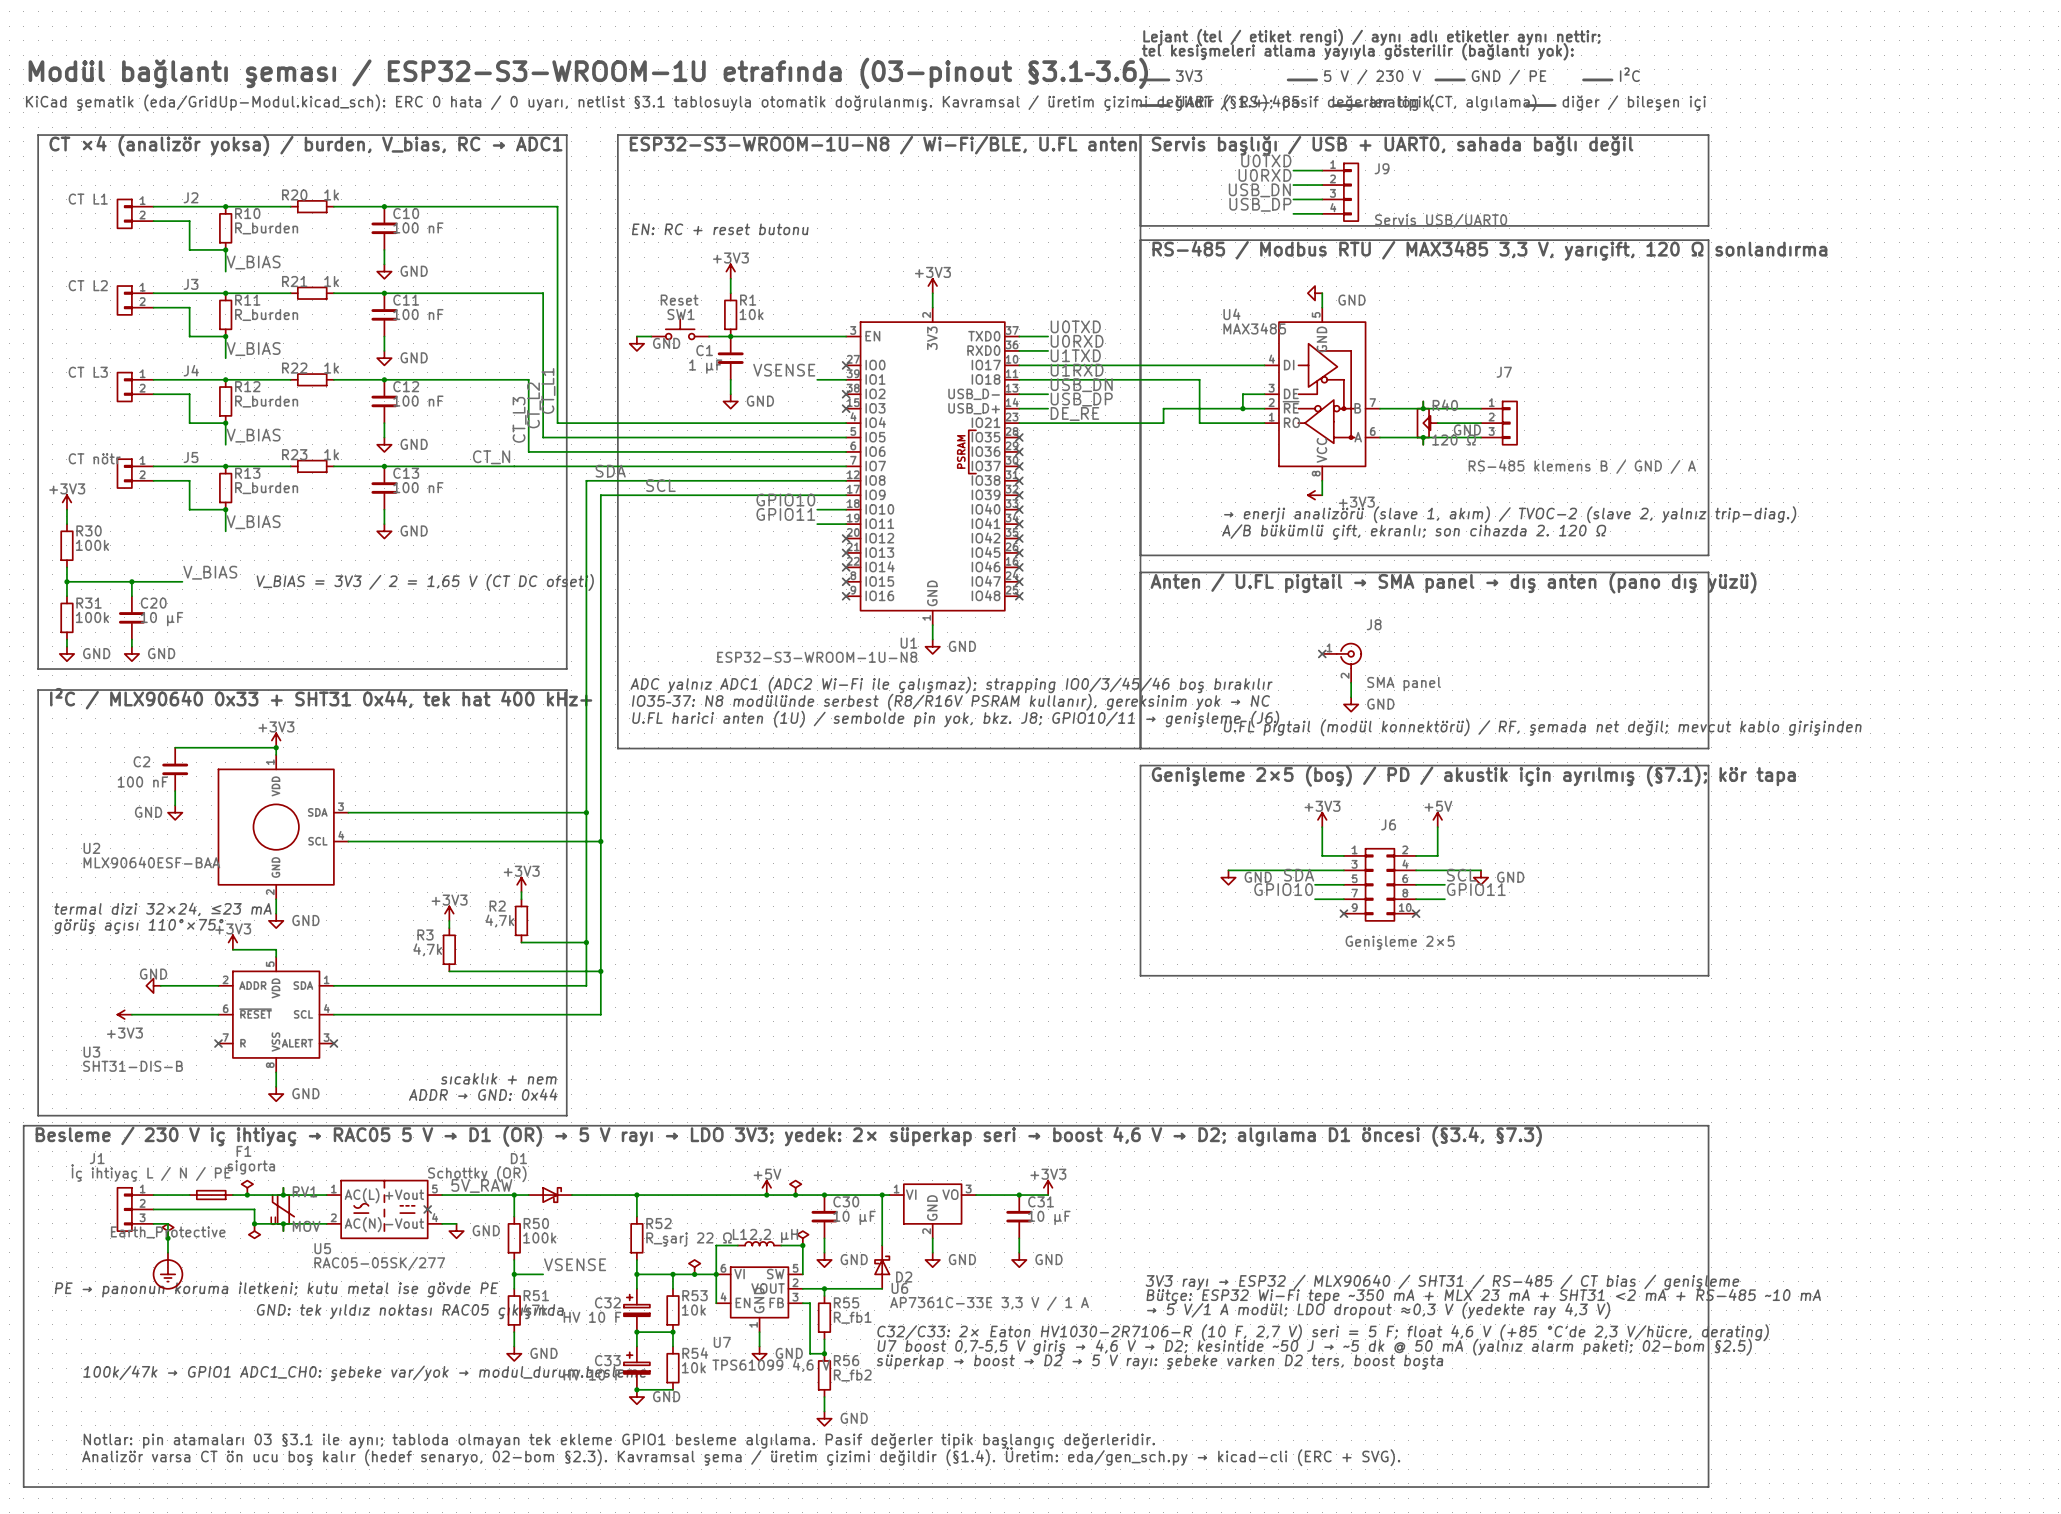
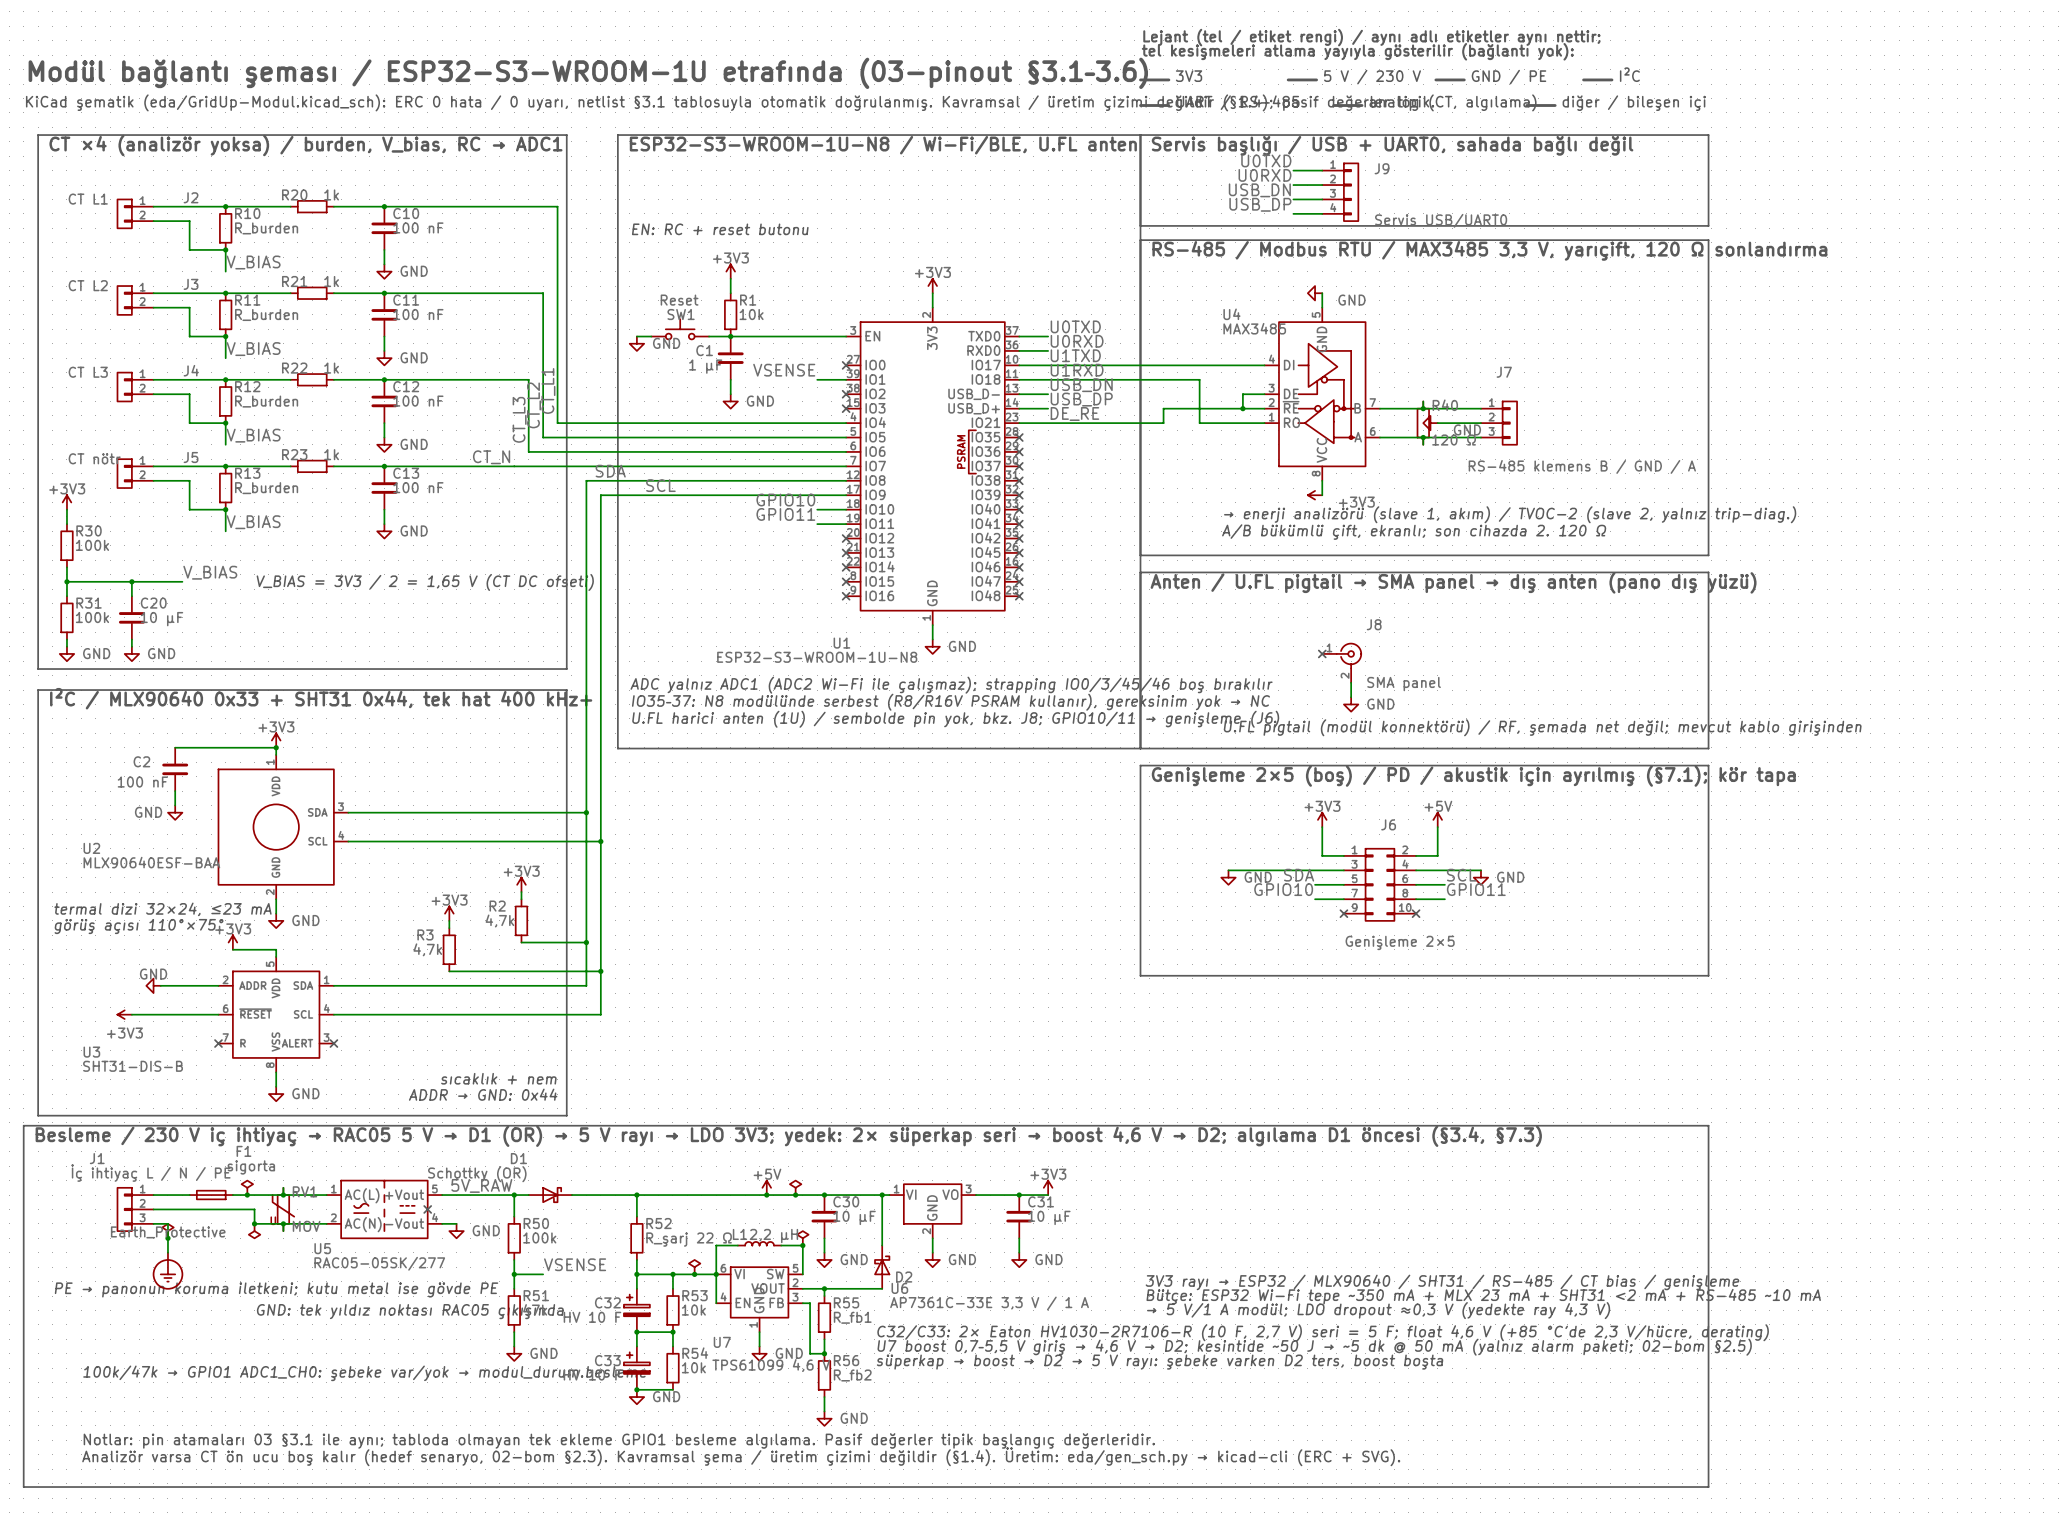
U1 name position: U1 (908, 643) -> U1 (841, 643)

